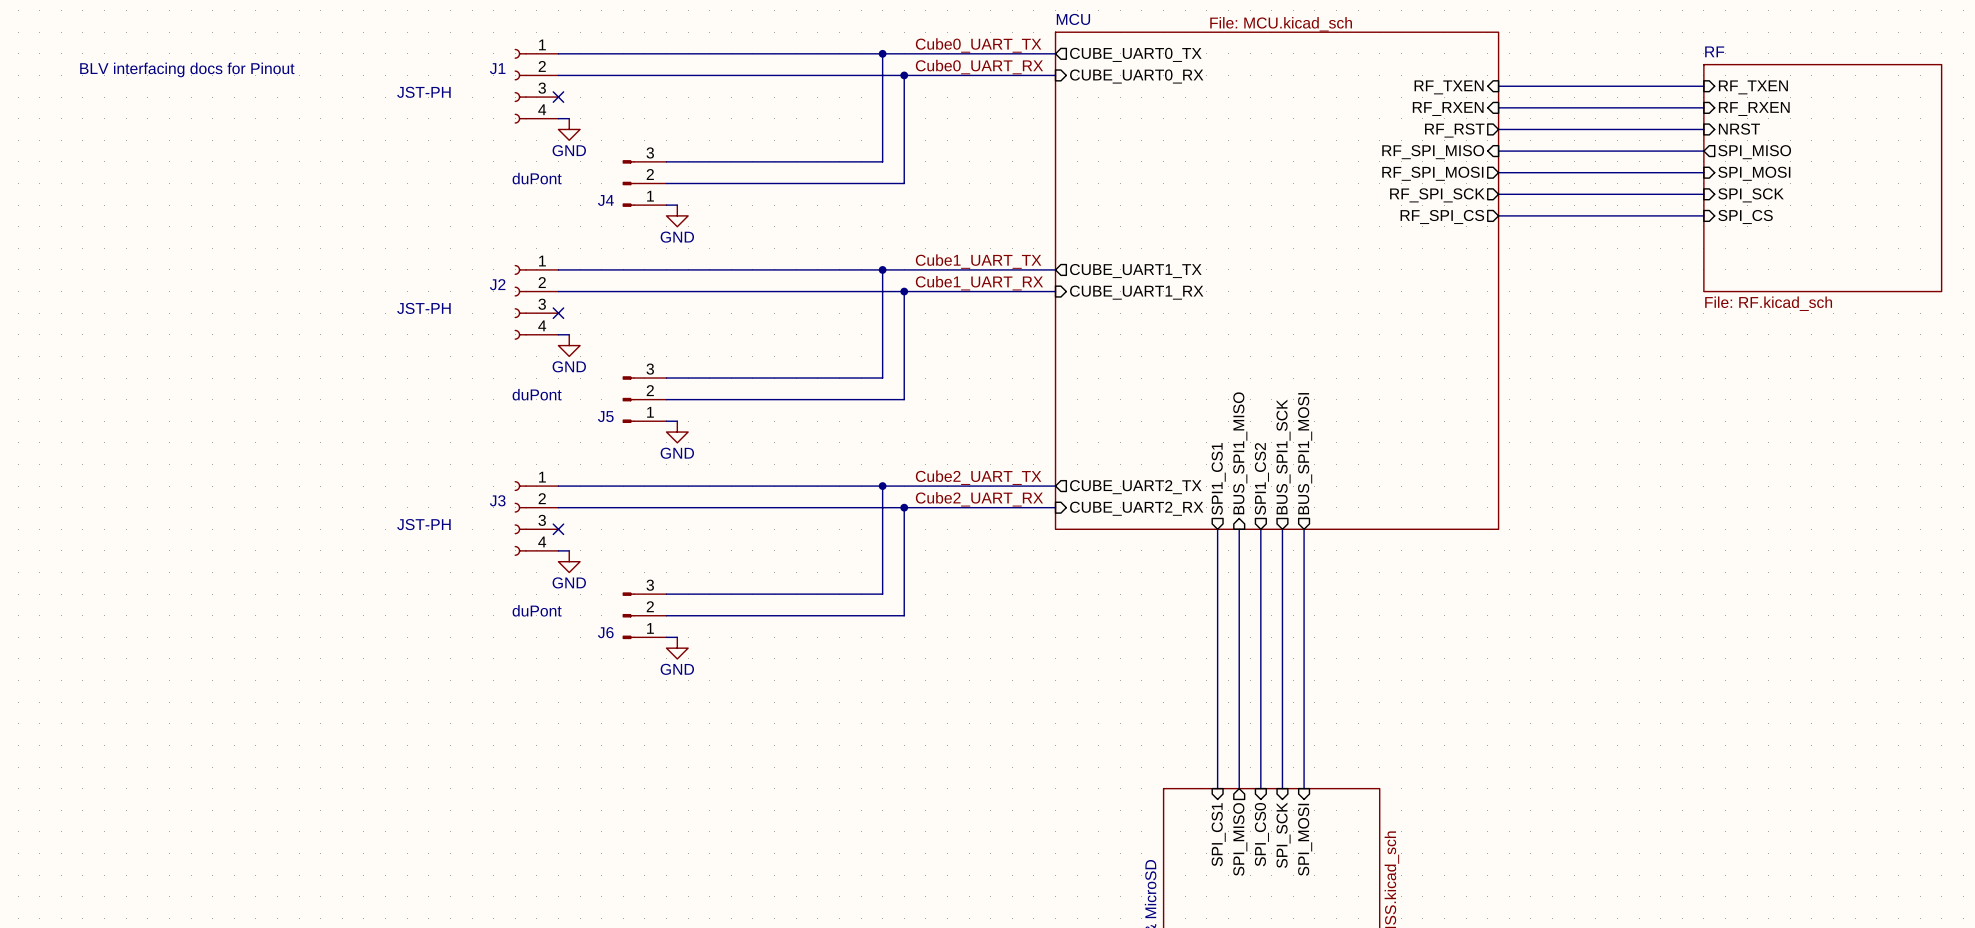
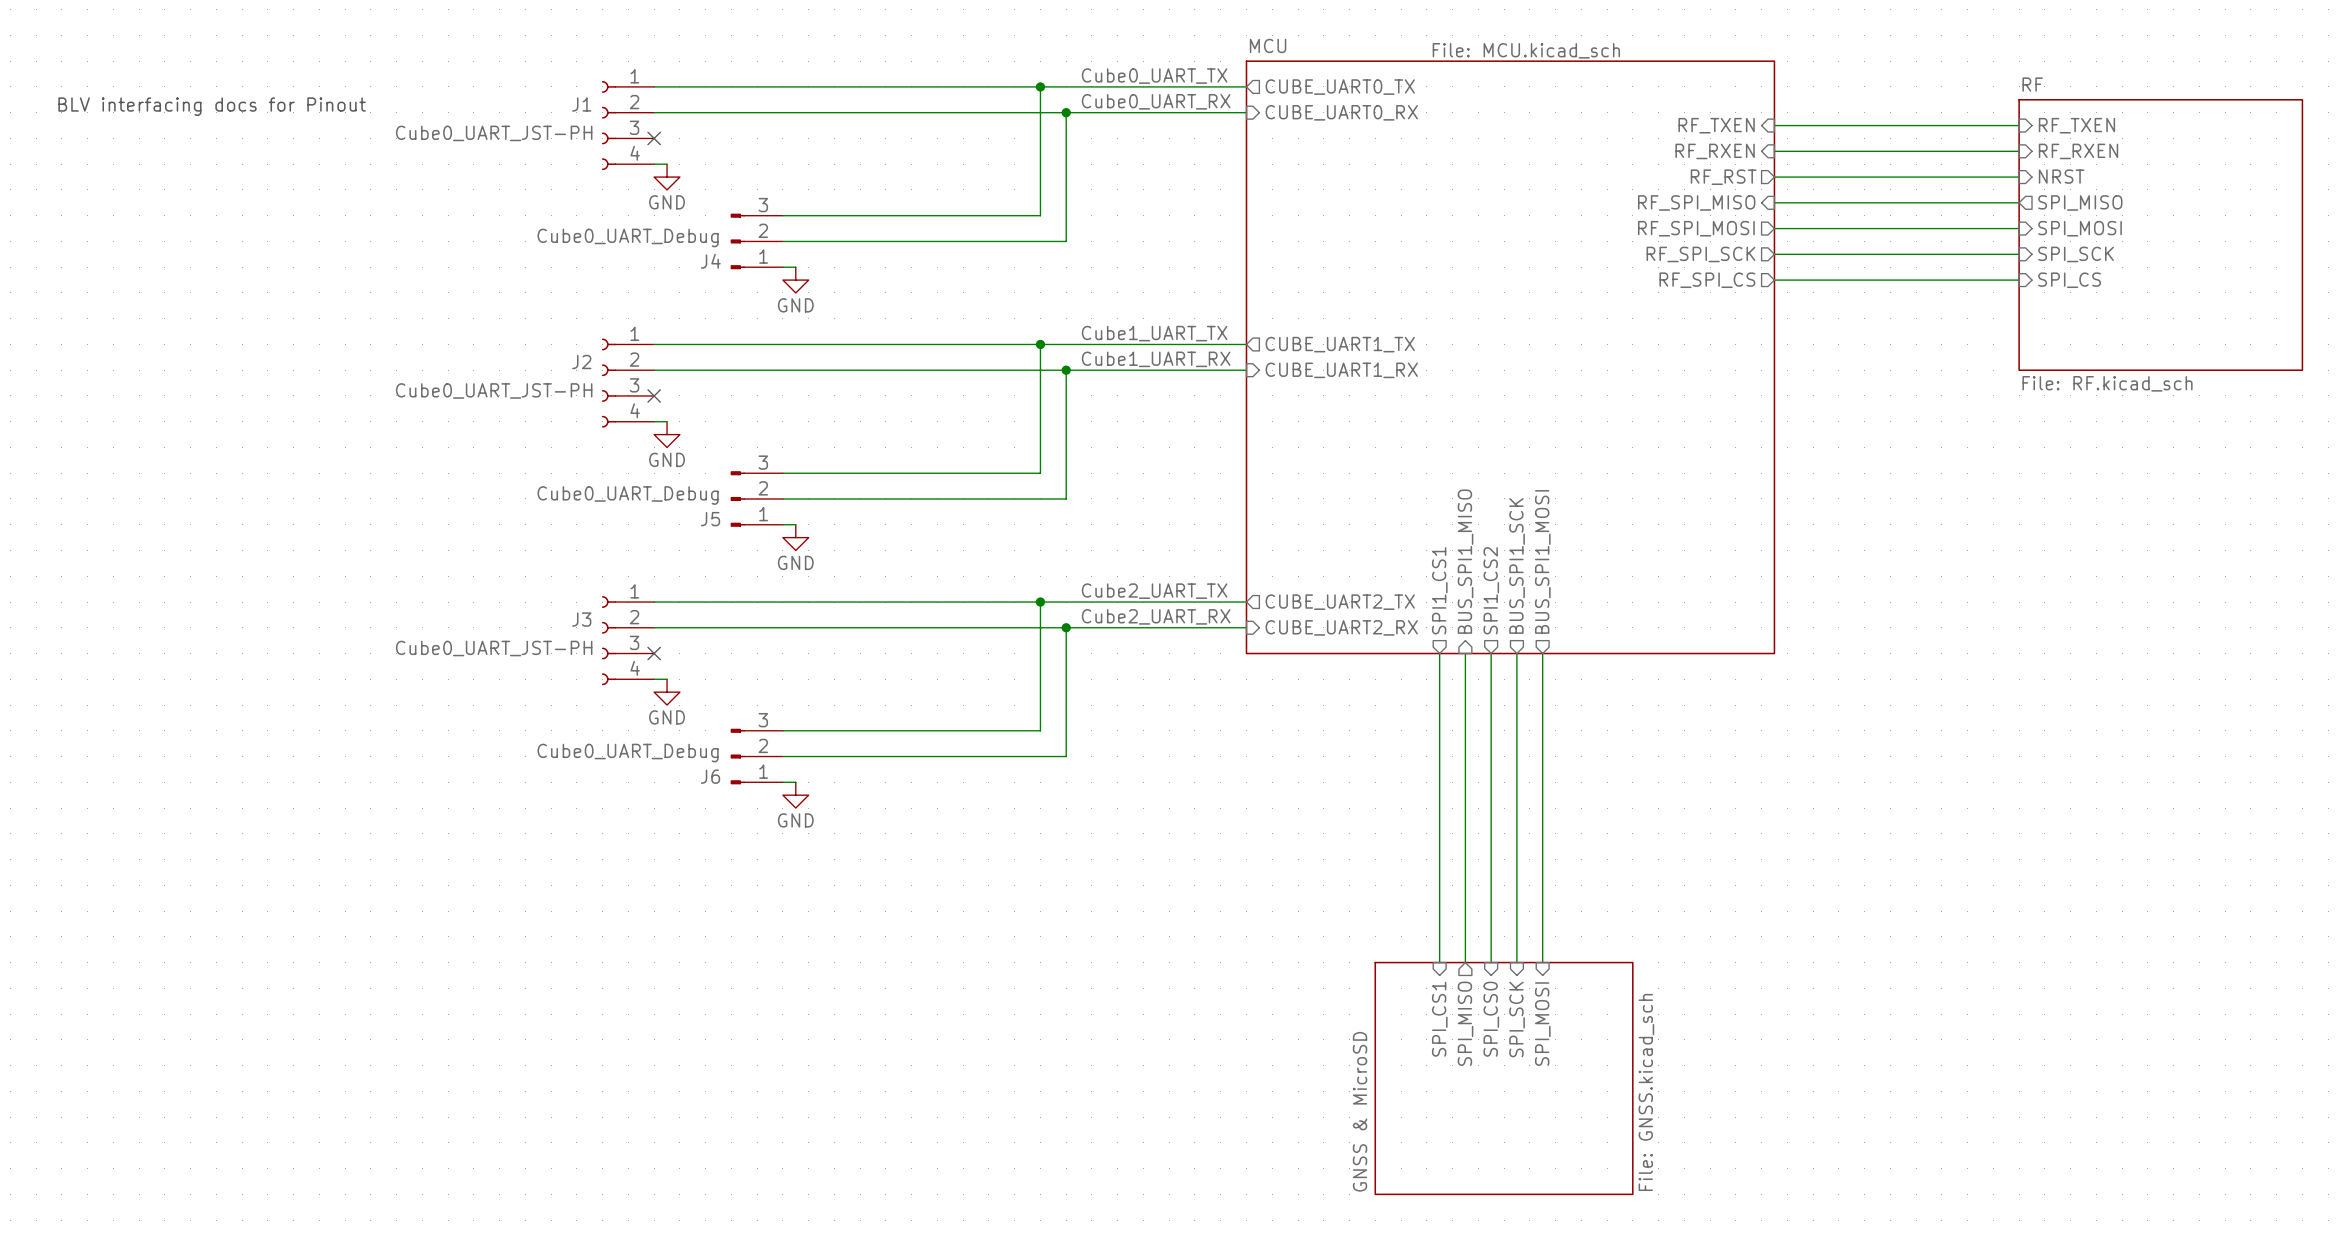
J1 value: JST-PH (423, 92) -> Cube0_UART_JST-PH (494, 133)
J4 value: duPont (537, 178) -> Cube0_UART_Debug (628, 237)
J2 value: JST-PH (423, 308) -> Cube0_UART_JST-PH (494, 390)
J5 value: duPont (537, 394) -> Cube0_UART_Debug (628, 495)
J3 value: JST-PH (423, 524) -> Cube0_UART_JST-PH (494, 648)
J6 value: duPont (537, 610) -> Cube0_UART_Debug (628, 753)

